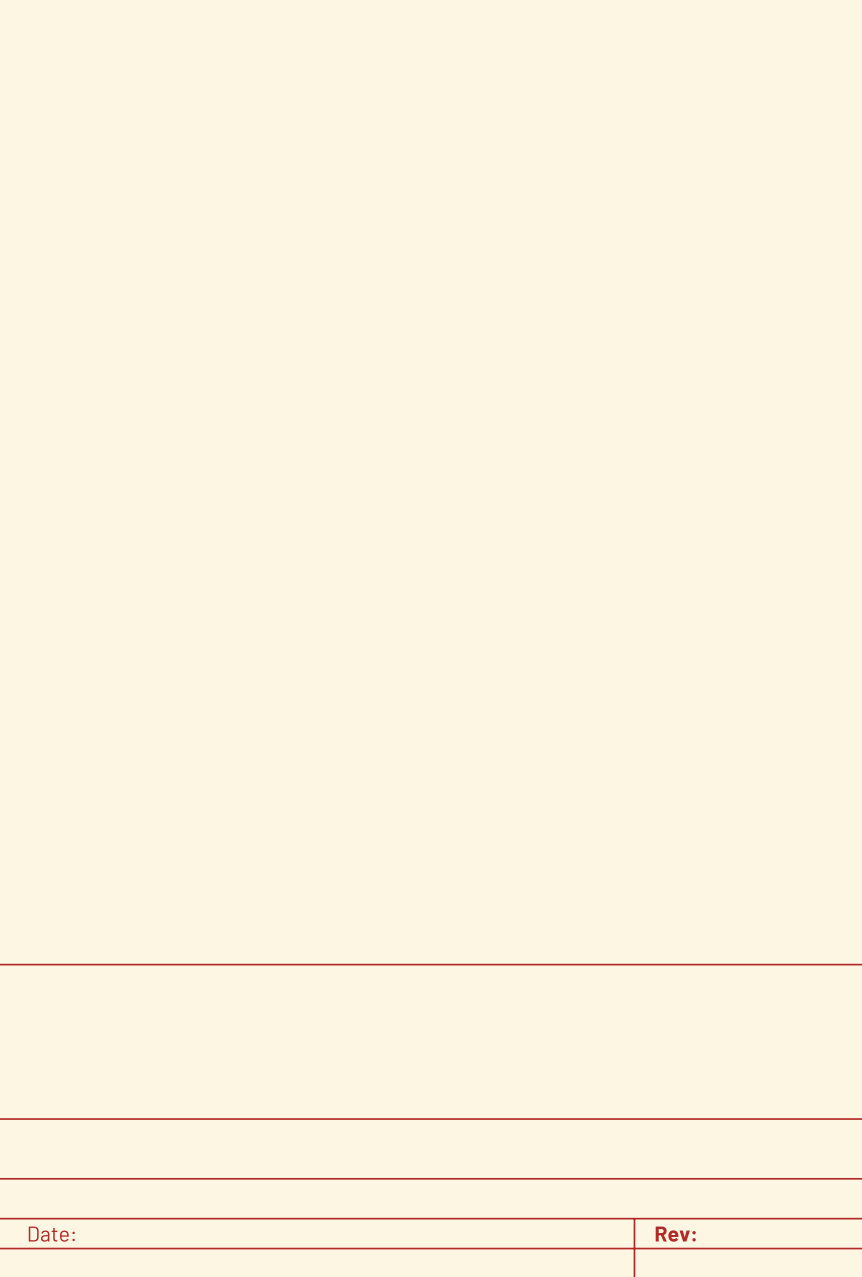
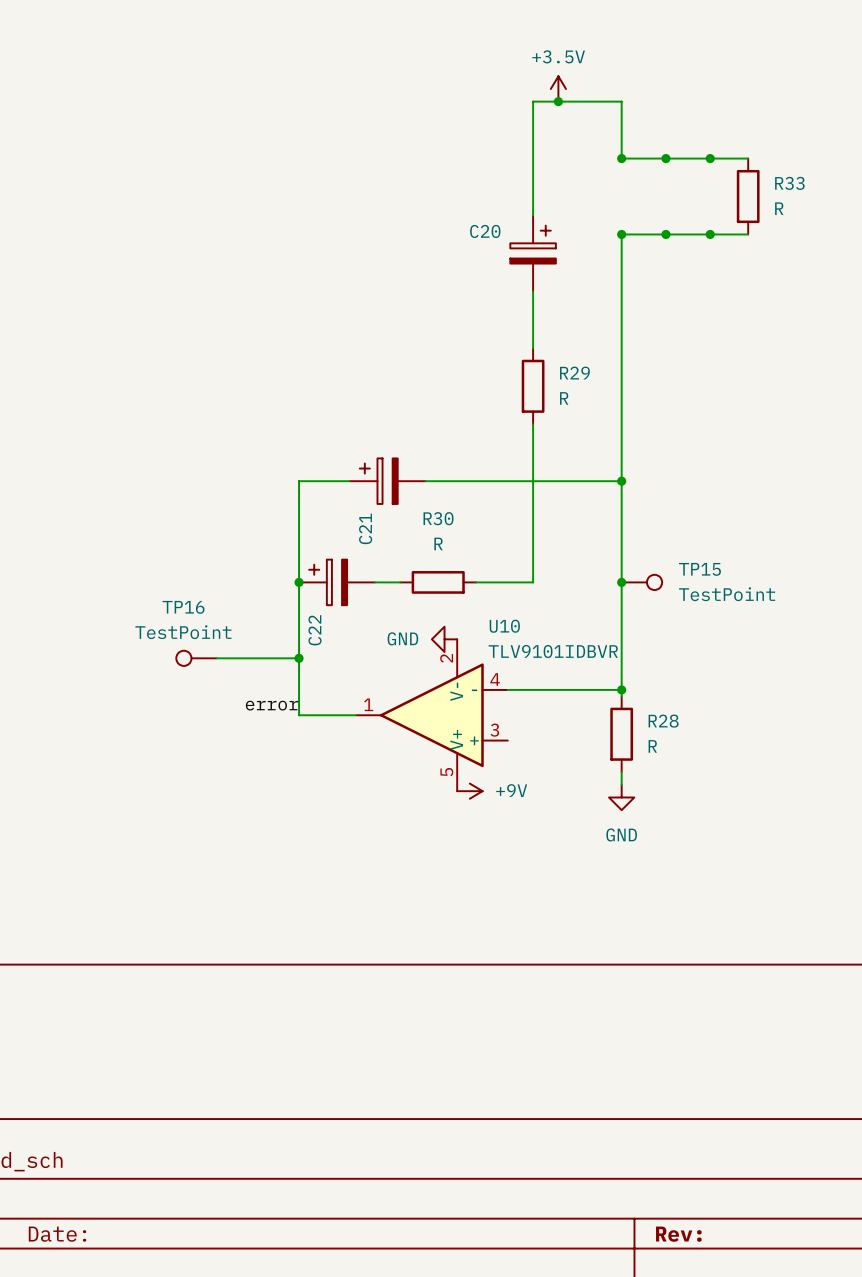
power symbol: none -> +3.5V (558, 88)
junction: none -> (558, 101)
junction: none -> (621, 158)
junction: none -> (665, 158)
junction: none -> (710, 158)
wire: none -> (748, 158) (621, 158) (621, 101) (533, 101) (533, 215)
R33: none -> R (748, 196)
junction: none -> (621, 234)
junction: none -> (665, 234)
junction: none -> (710, 234)
wire: none -> (748, 234) (621, 234) (621, 696)
C20: none -> (533, 253)
wire: none -> (533, 291) (533, 348)
R29: none -> R (533, 386)
wire: none -> (533, 424) (533, 582) (476, 582)
wire: none -> (349, 481) (299, 481) (299, 715) (355, 715)
C21: none -> (387, 481)
wire: none -> (425, 481) (621, 481)
junction: none -> (621, 481)
junction: none -> (299, 582)
C22: none -> (336, 582)
wire: none -> (374, 582) (400, 582)
R30: none -> R (438, 582)
junction: none -> (621, 582)
TP15: none -> TestPoint (641, 582)
power symbol: none -> GND (444, 639)
TP16: none -> TestPoint (196, 658)
wire: none -> (216, 658) (299, 658)
junction: none -> (299, 658)
wire: none -> (507, 689) (621, 689)
junction: none -> (621, 689)
label: none -> error (272, 705)
U10: none -> TLV9101IDBVR (431, 715)
R28: none -> R (621, 734)
wire: none -> (621, 772) (621, 784)
power symbol: none -> +9V (469, 791)
power symbol: none -> GND (621, 797)

